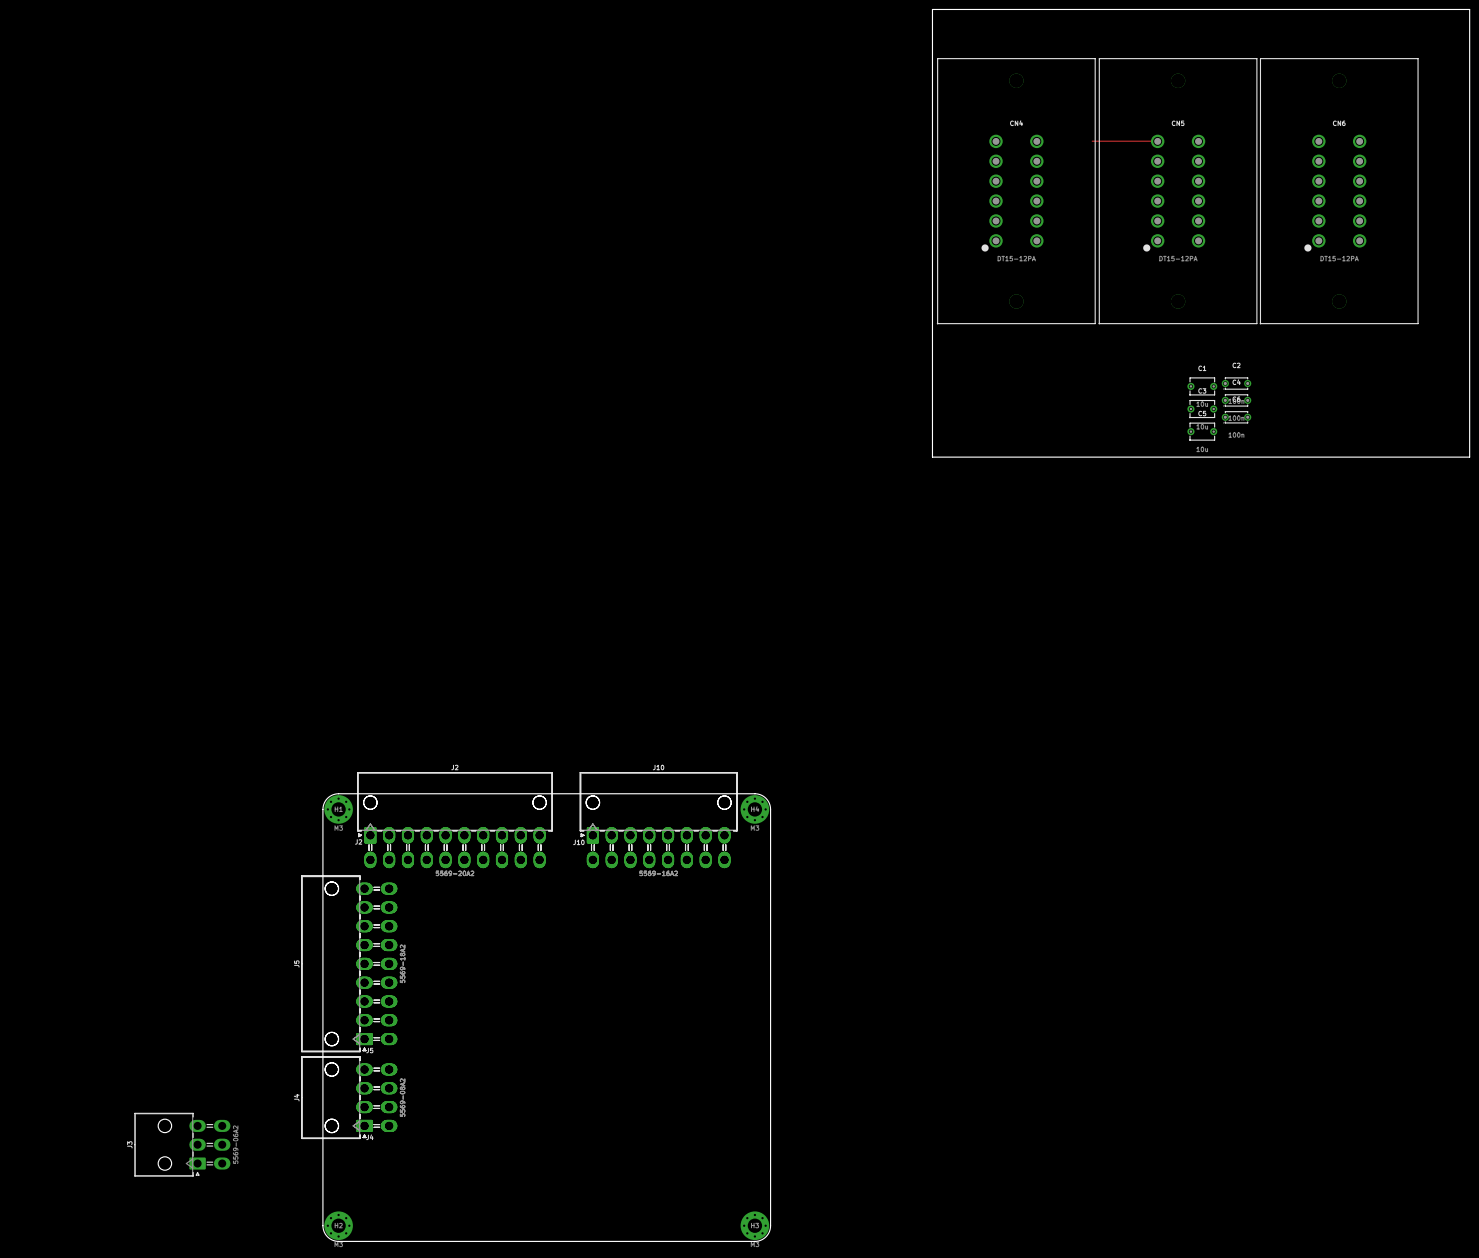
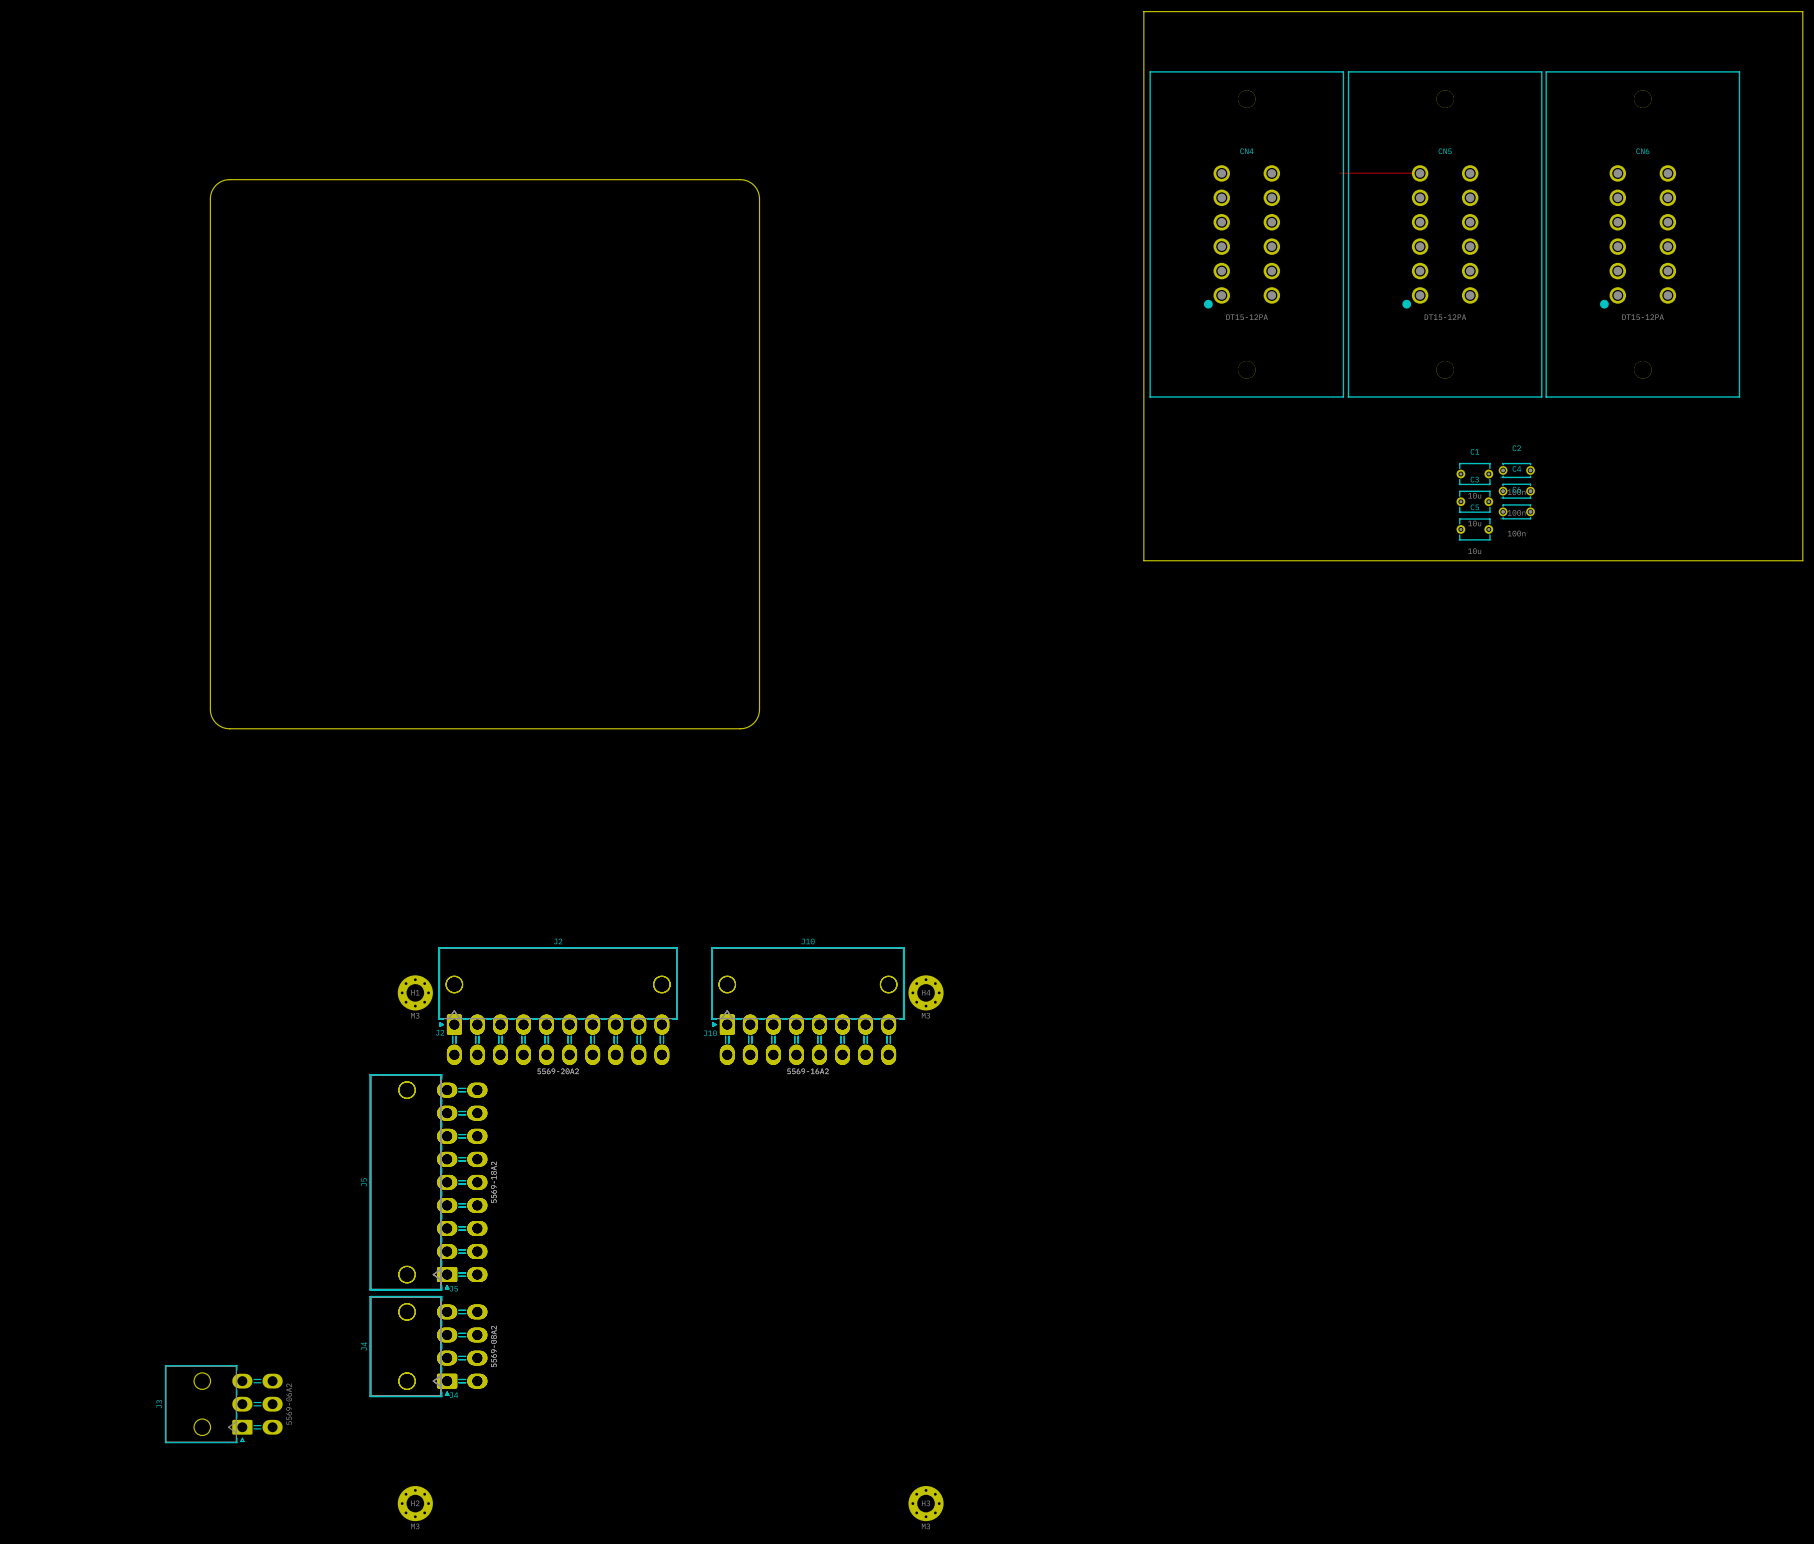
board edge: none -> (229, 179) (740, 179) (753, 185) (759, 198) (759, 709) (753, 723) (740, 728) (229, 728) (216, 723) (210, 709) (210, 198) (216, 185) (229, 179)
board edge: (338, 793) (754, 793) (765, 798) (770, 809) (770, 1225) (765, 1236) (754, 1241) (338, 1241) (327, 1236) (322, 1225) (322, 809) (327, 798) (338, 793) -> none

